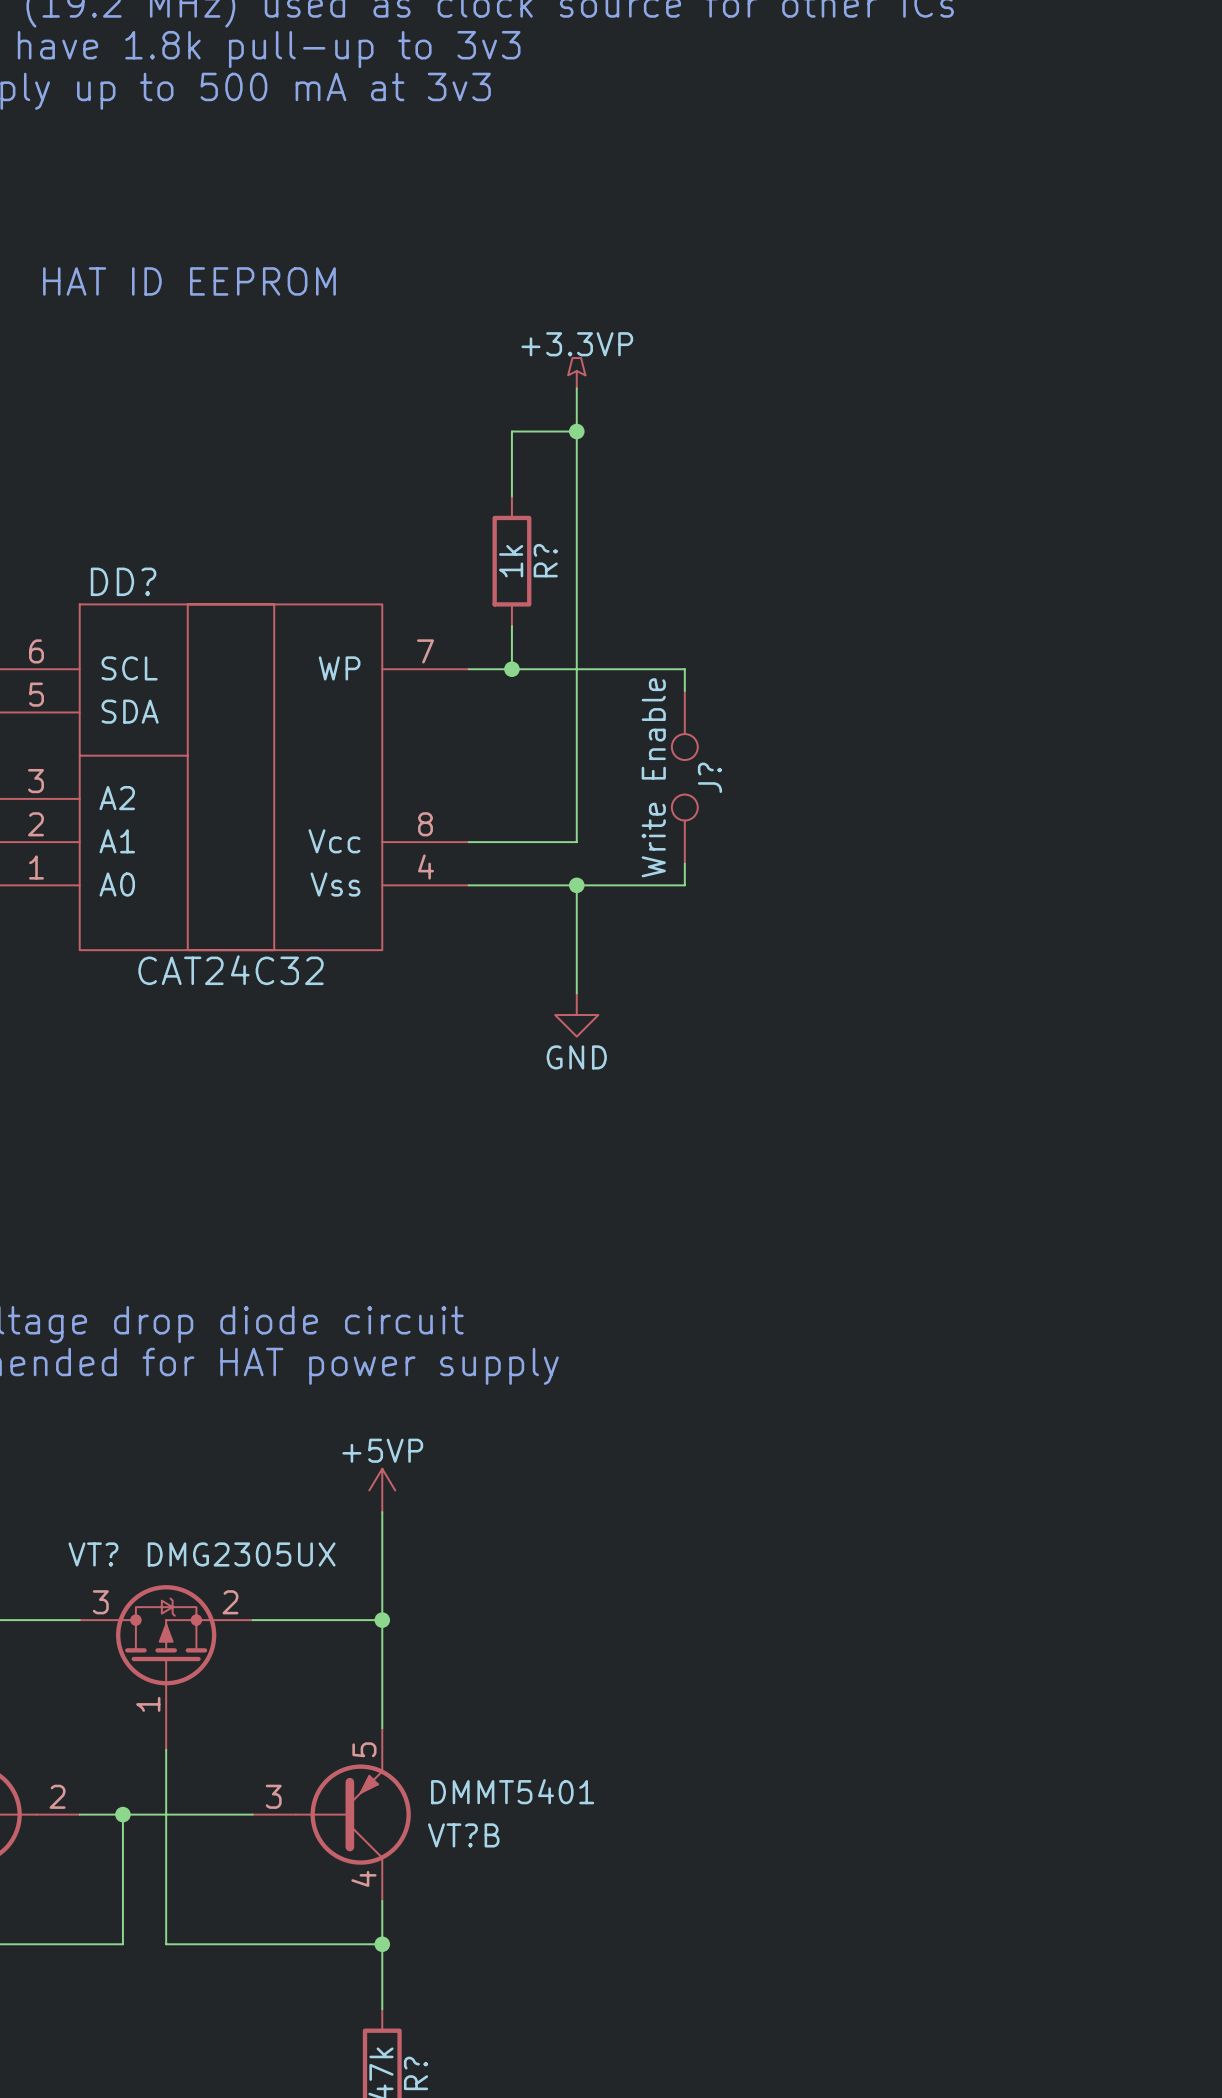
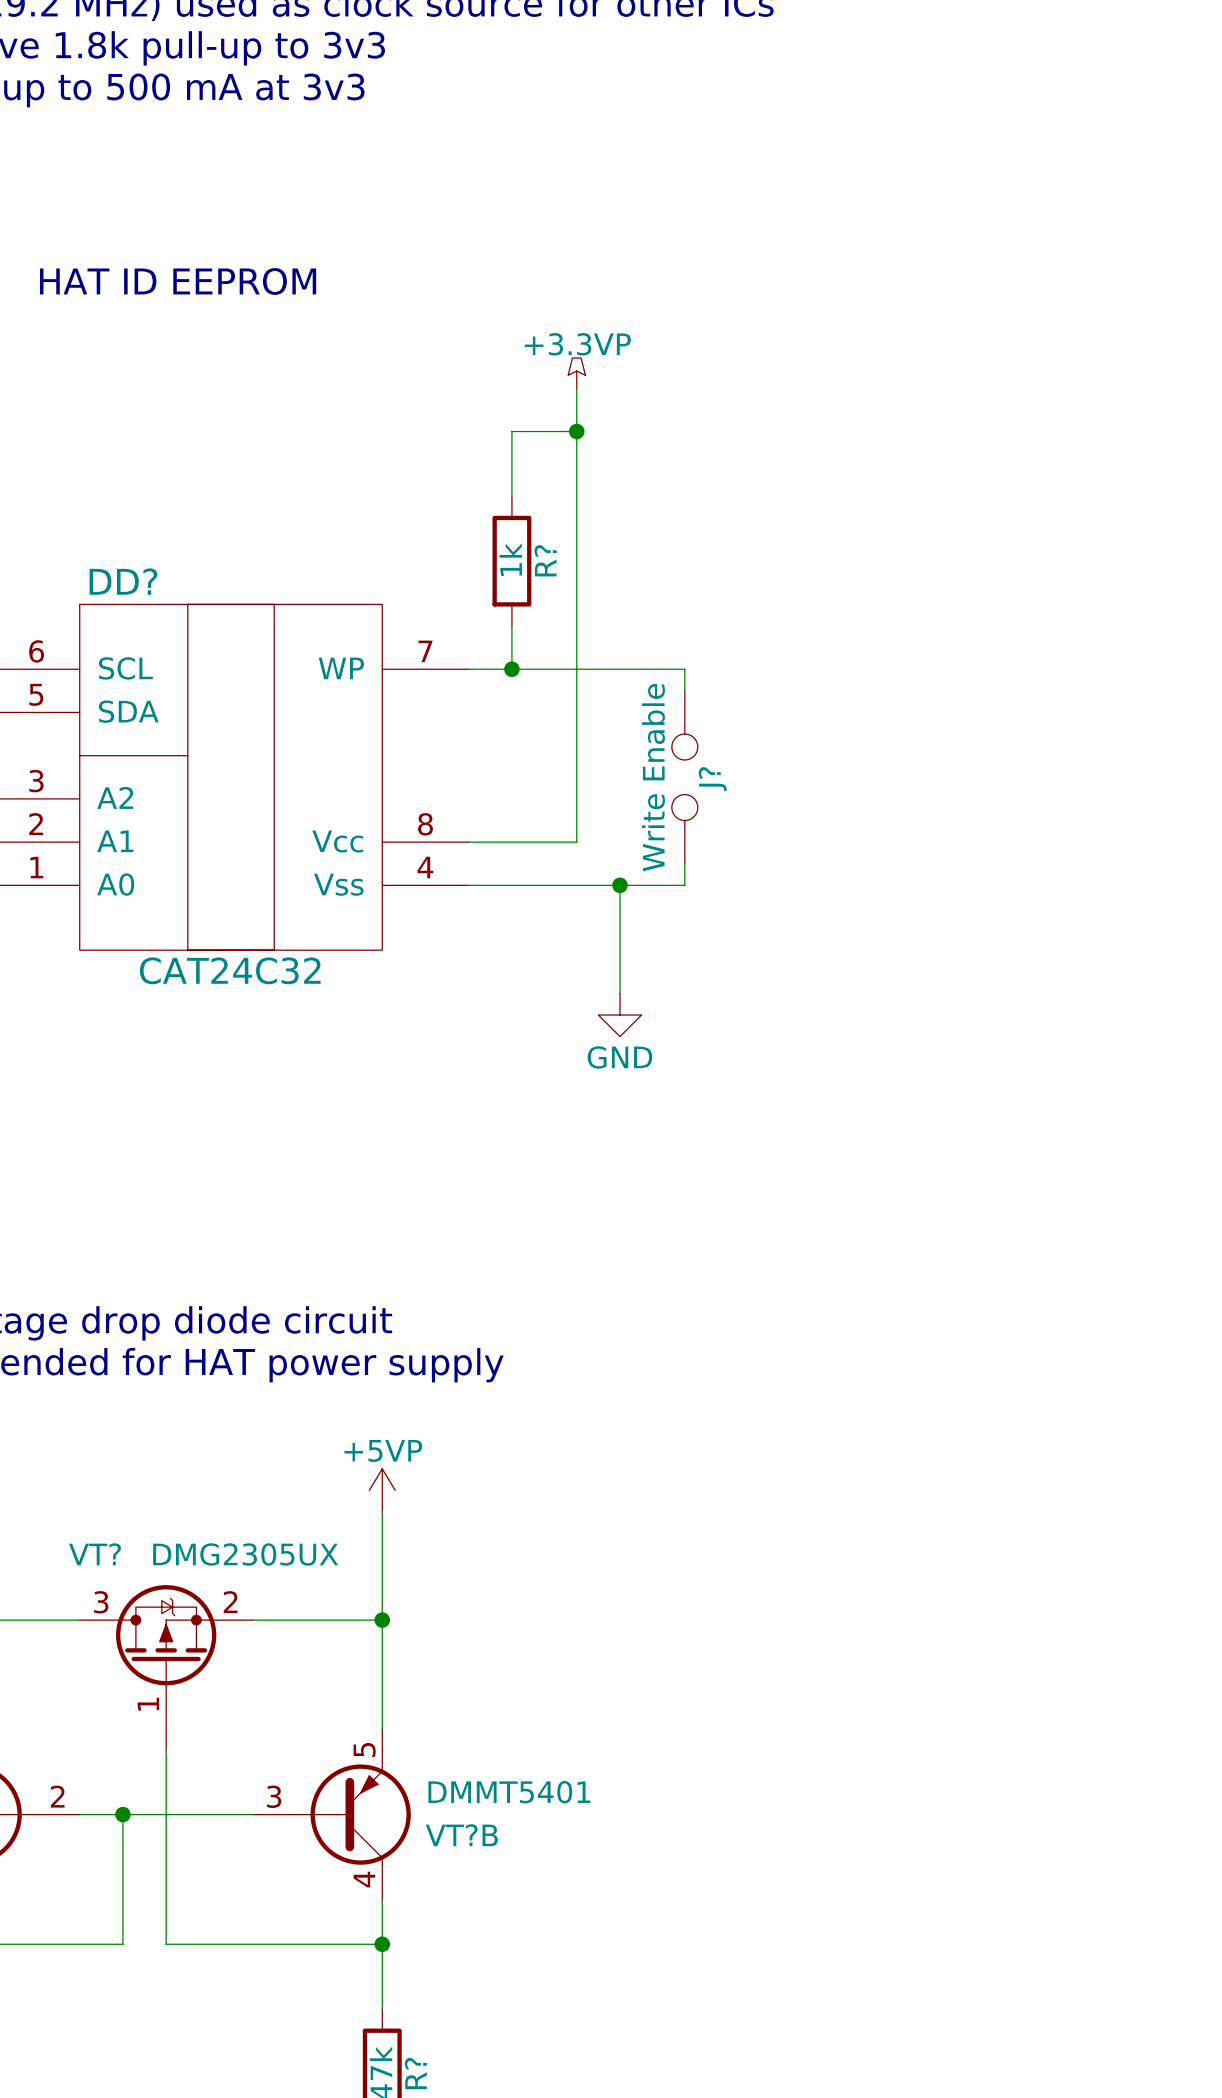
wire: (576, 885) (576, 993) -> (619, 885) (619, 993)
junction position: (576, 885) -> (619, 885)
power symbol position: GND (576, 1015) -> GND (619, 1015)

